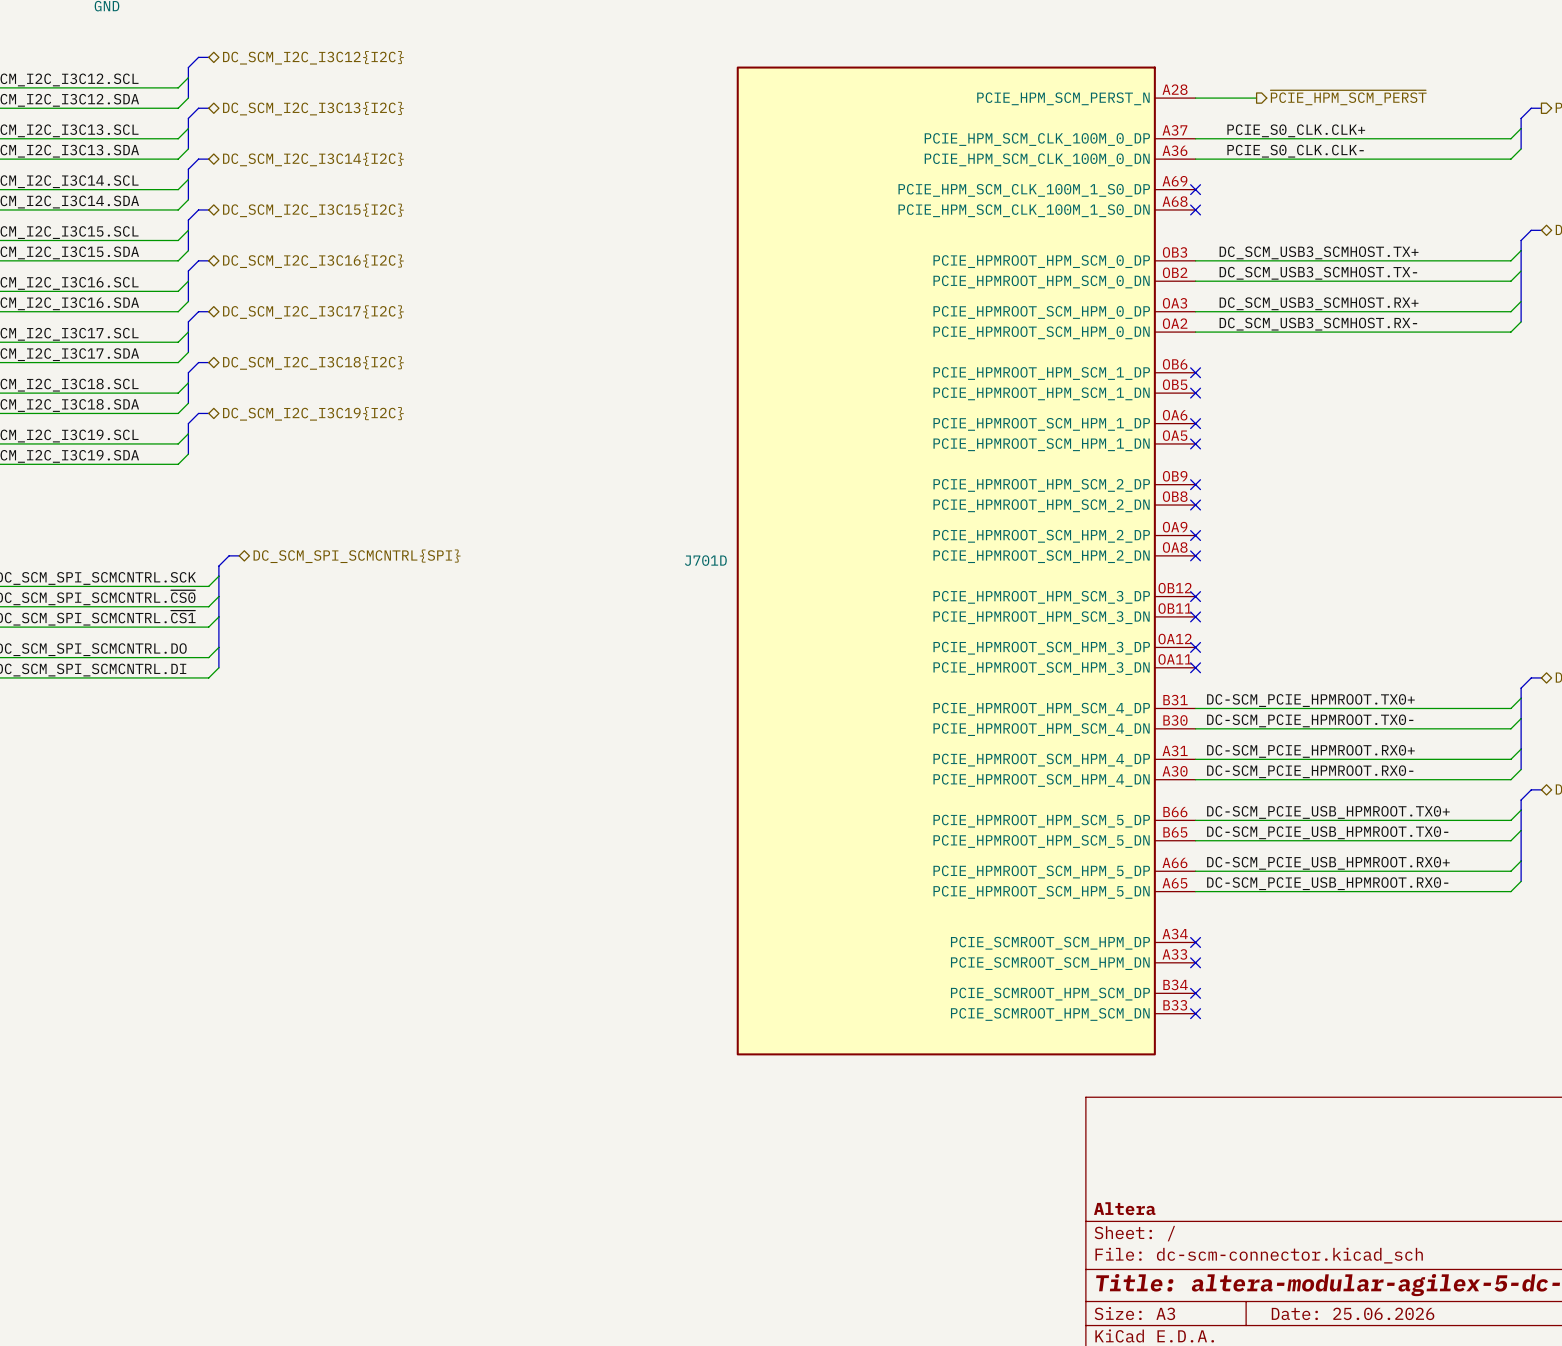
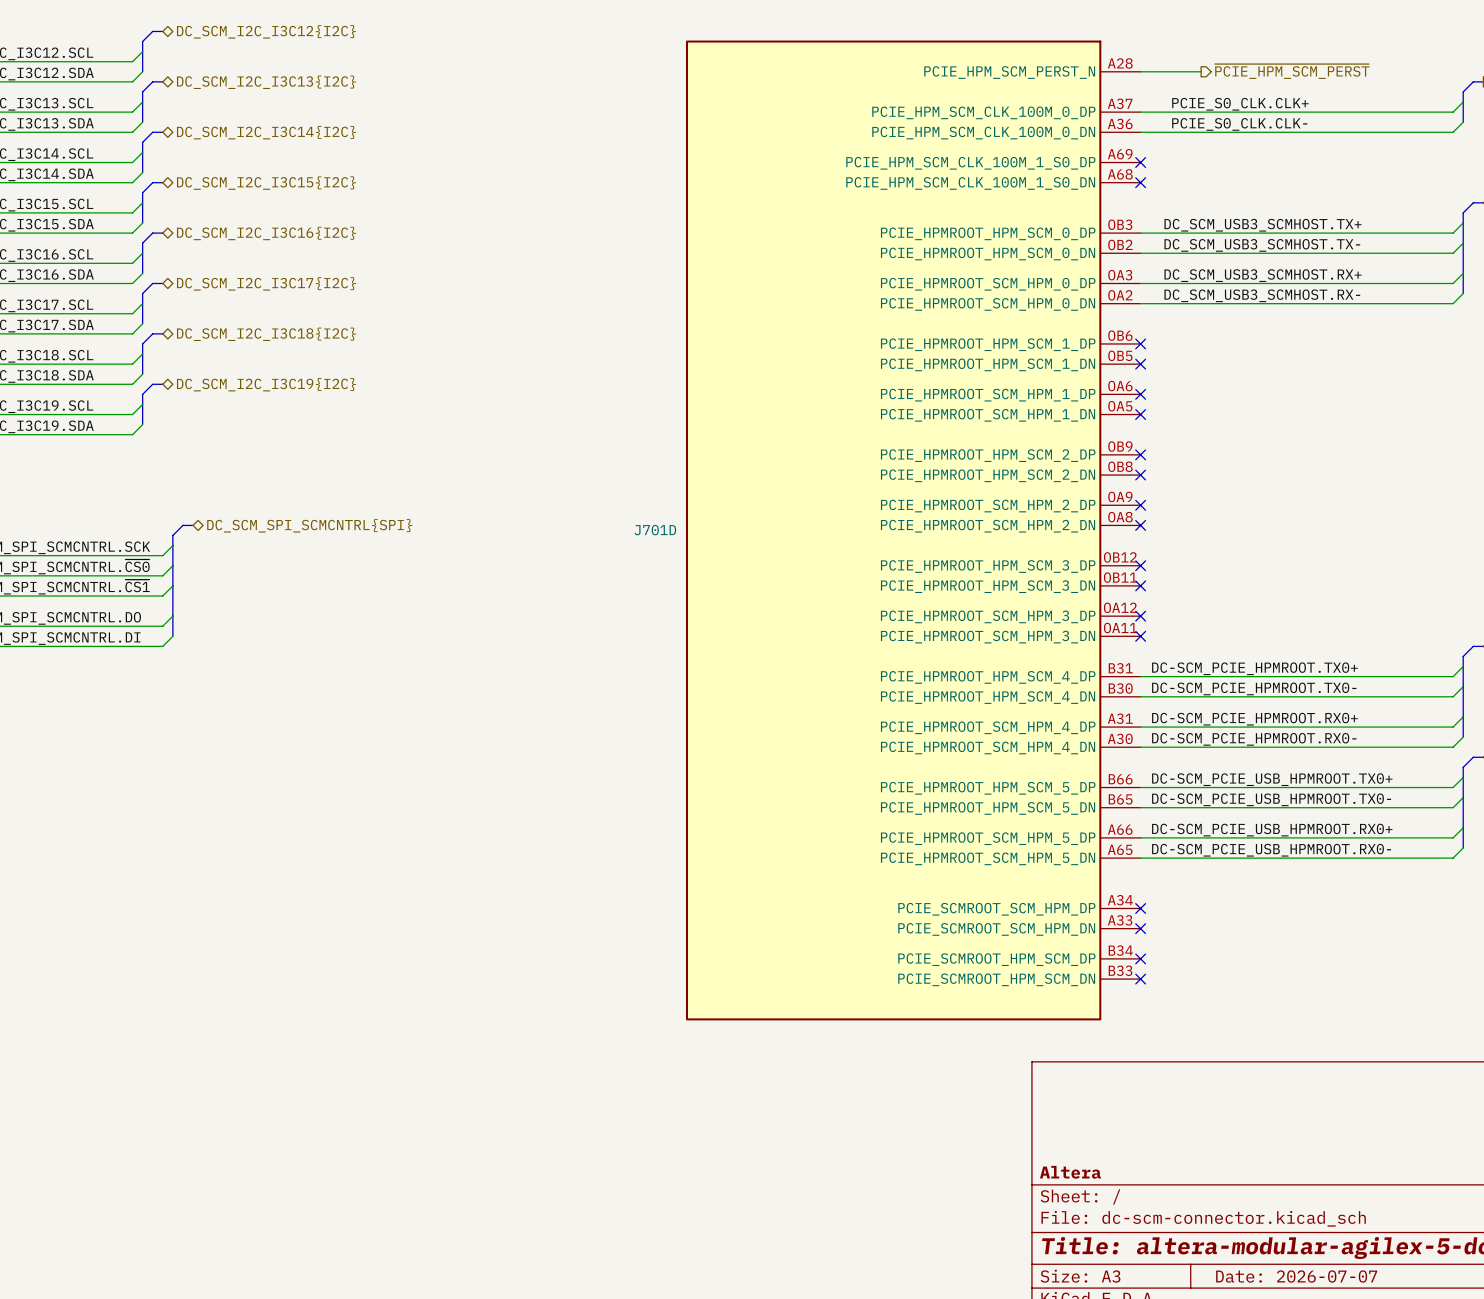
title block: Date: 25.06.2026 (1353, 1313) -> Date: 2026-07-07 (1296, 1276)

